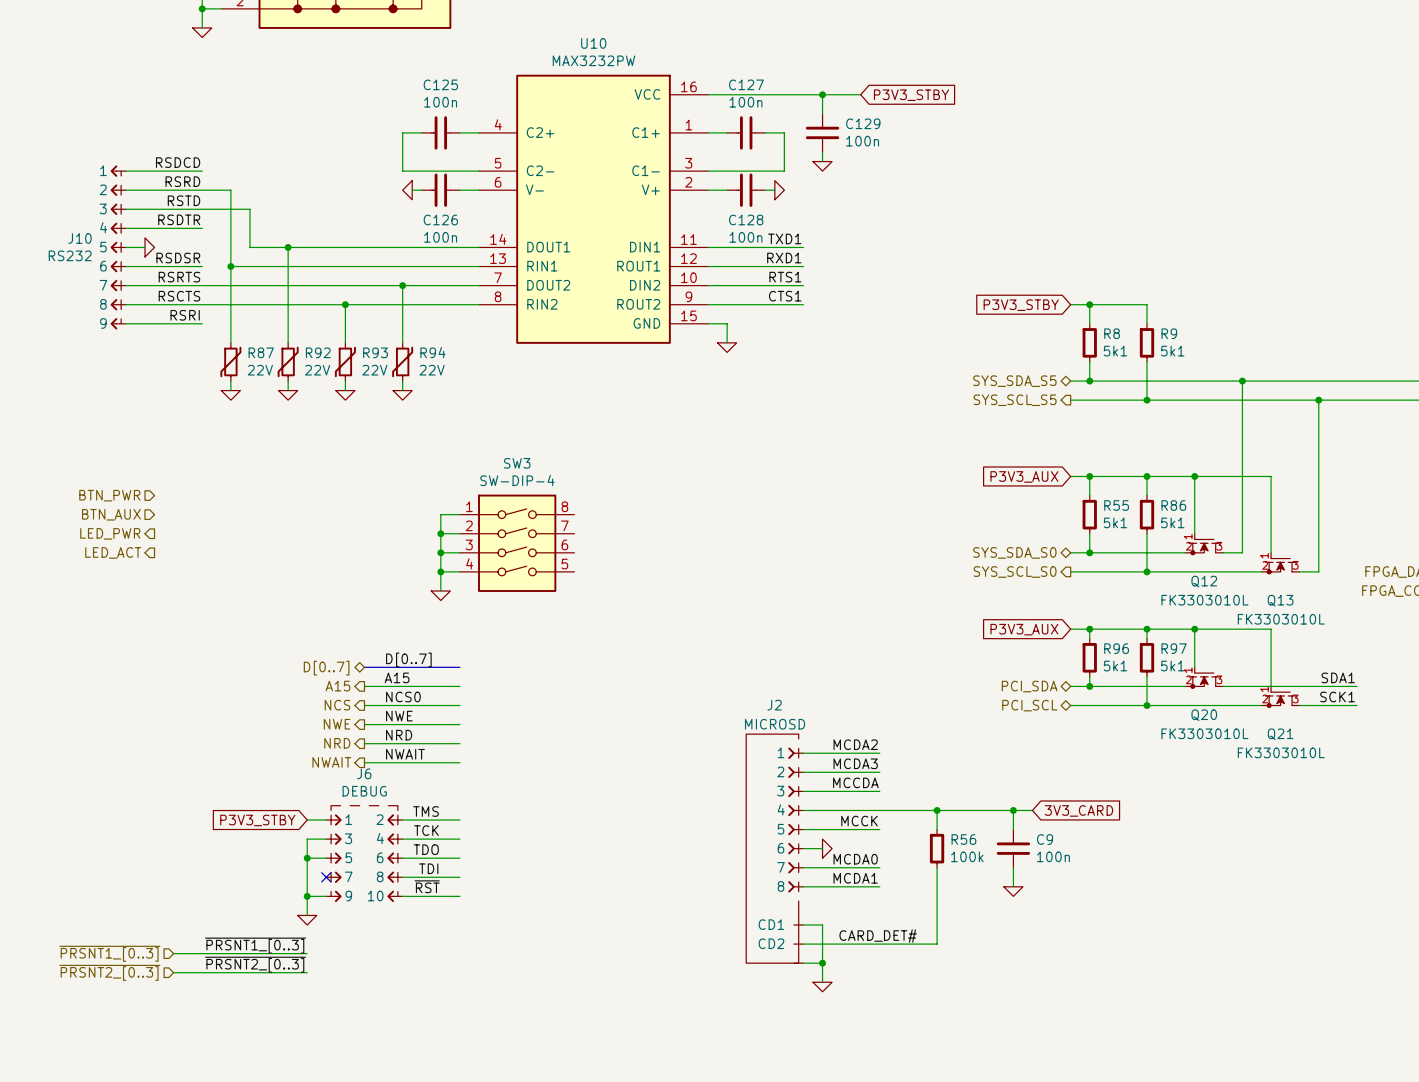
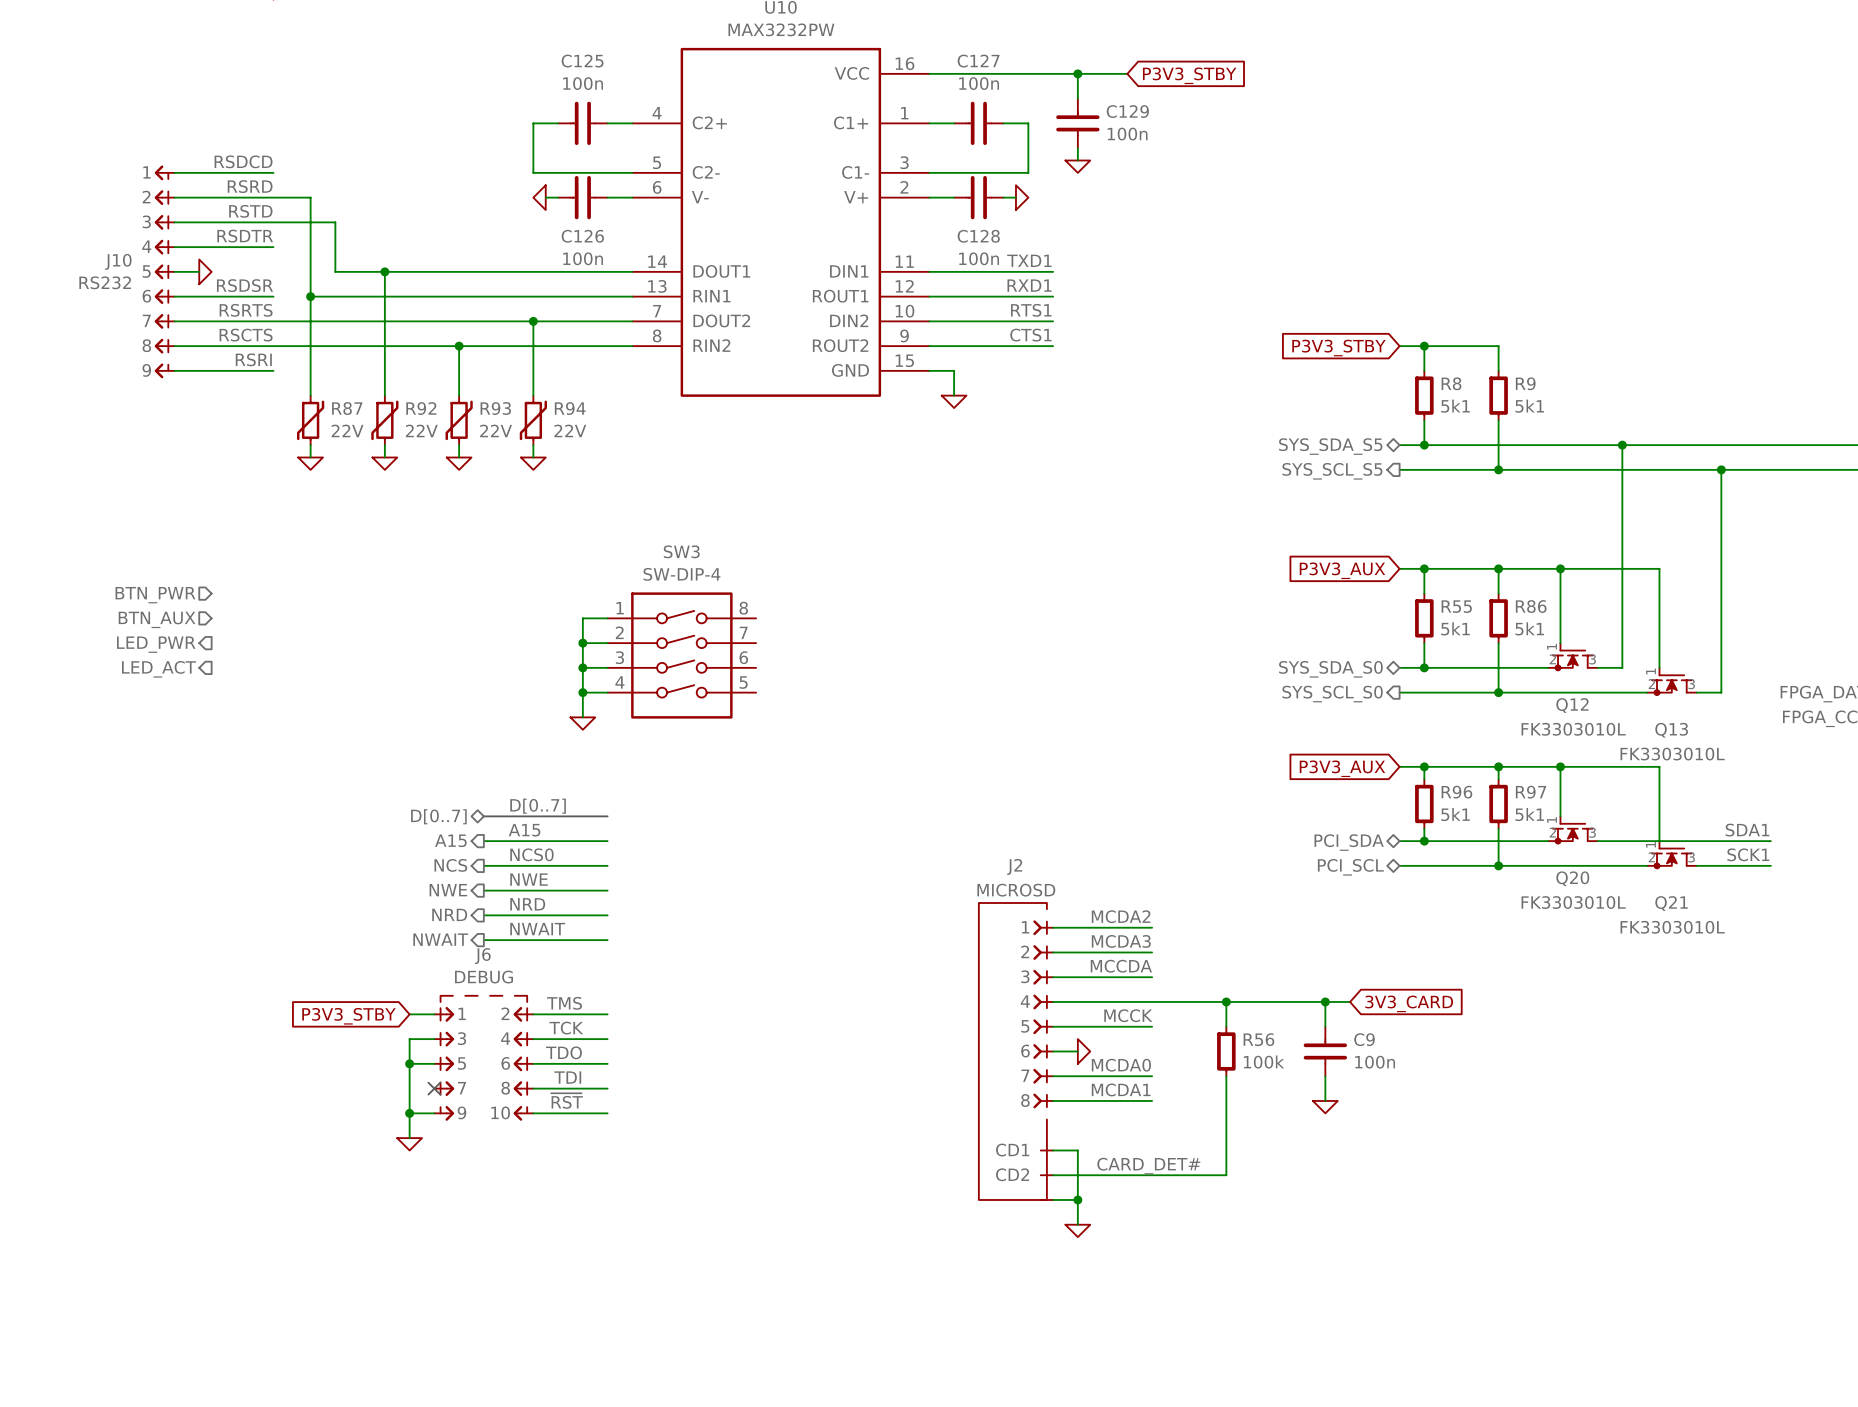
label: ~{PRSNT1_[0..3]} (255, 945) -> none
hierarchical label: ~{PRSNT1_[0..3]} (109, 953) -> none
wire: (173, 953) (307, 953) -> none
label: ~{PRSNT2_[0..3]} (255, 964) -> none
hierarchical label: ~{PRSNT2_[0..3]} (109, 972) -> none
wire: (173, 972) (307, 972) -> none

